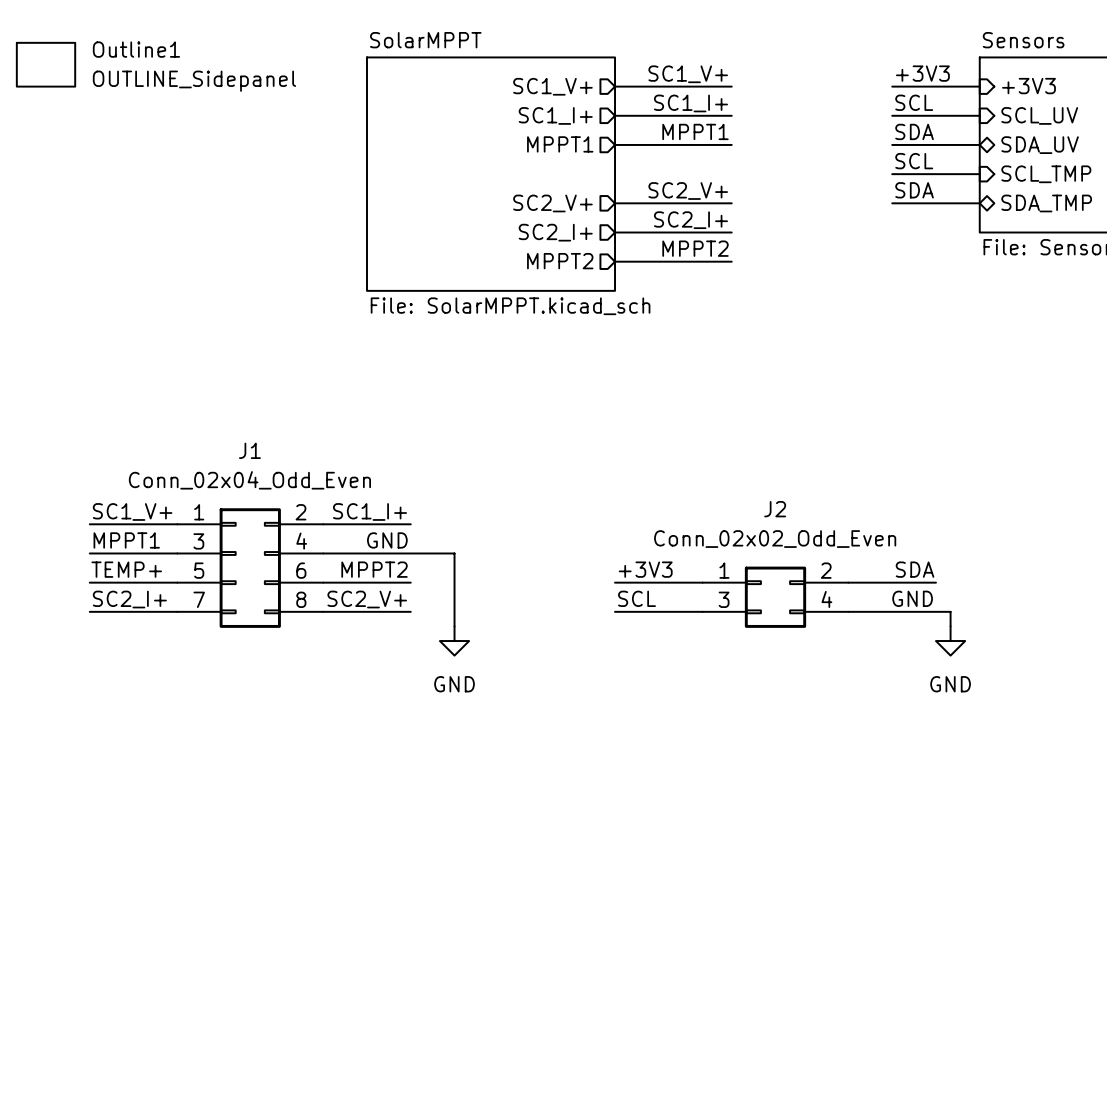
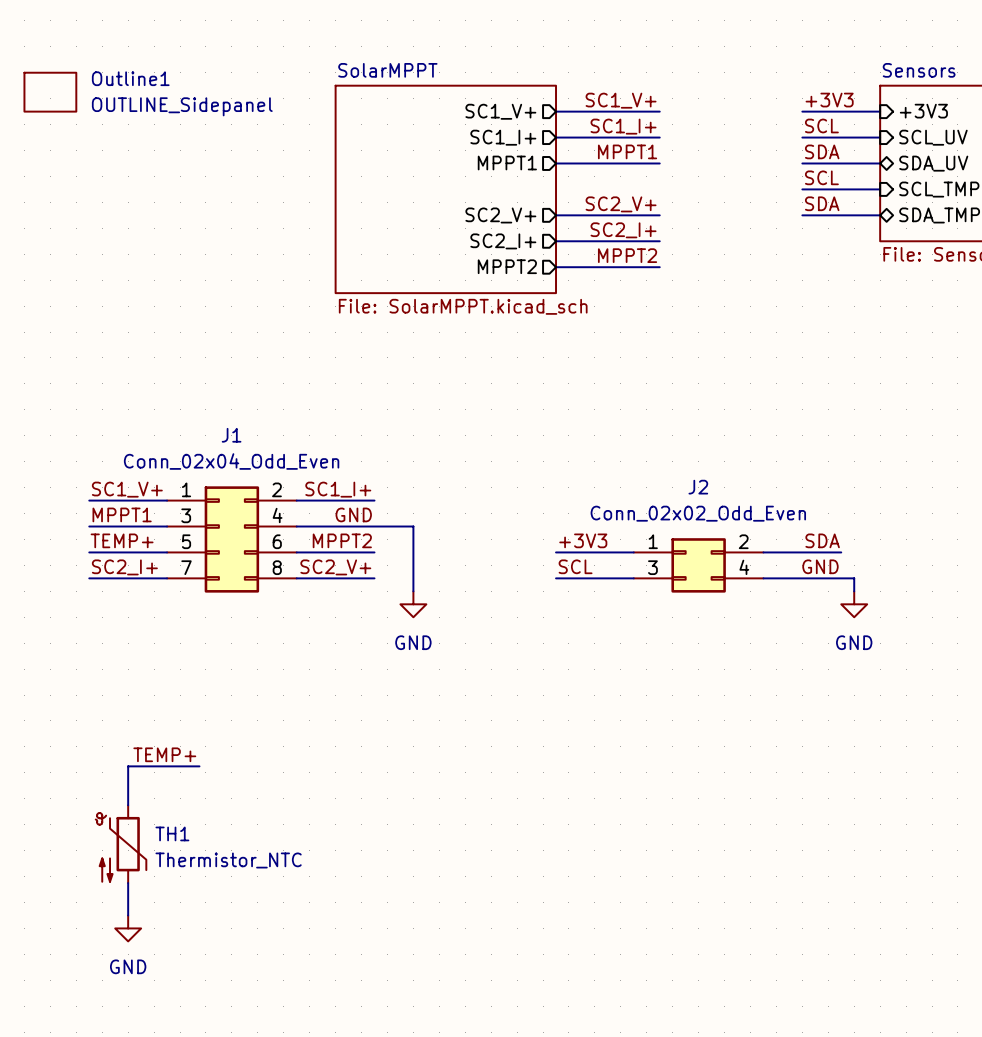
label: none -> TEMP+ (164, 754)
wire: none -> (199, 766) (128, 766) (128, 805)
TH1: none -> Thermistor_NTC (121, 844)
wire: none -> (128, 883) (128, 915)
power symbol: none -> GND (128, 928)

